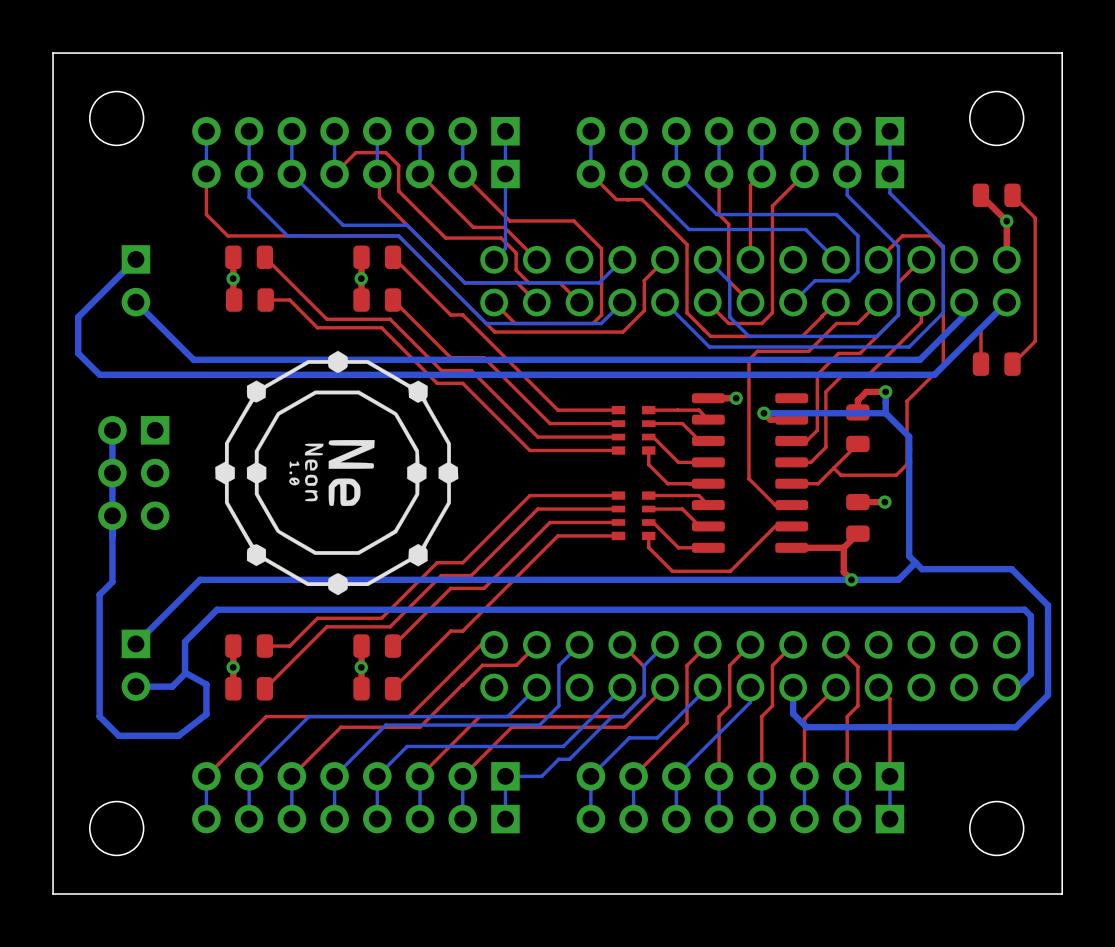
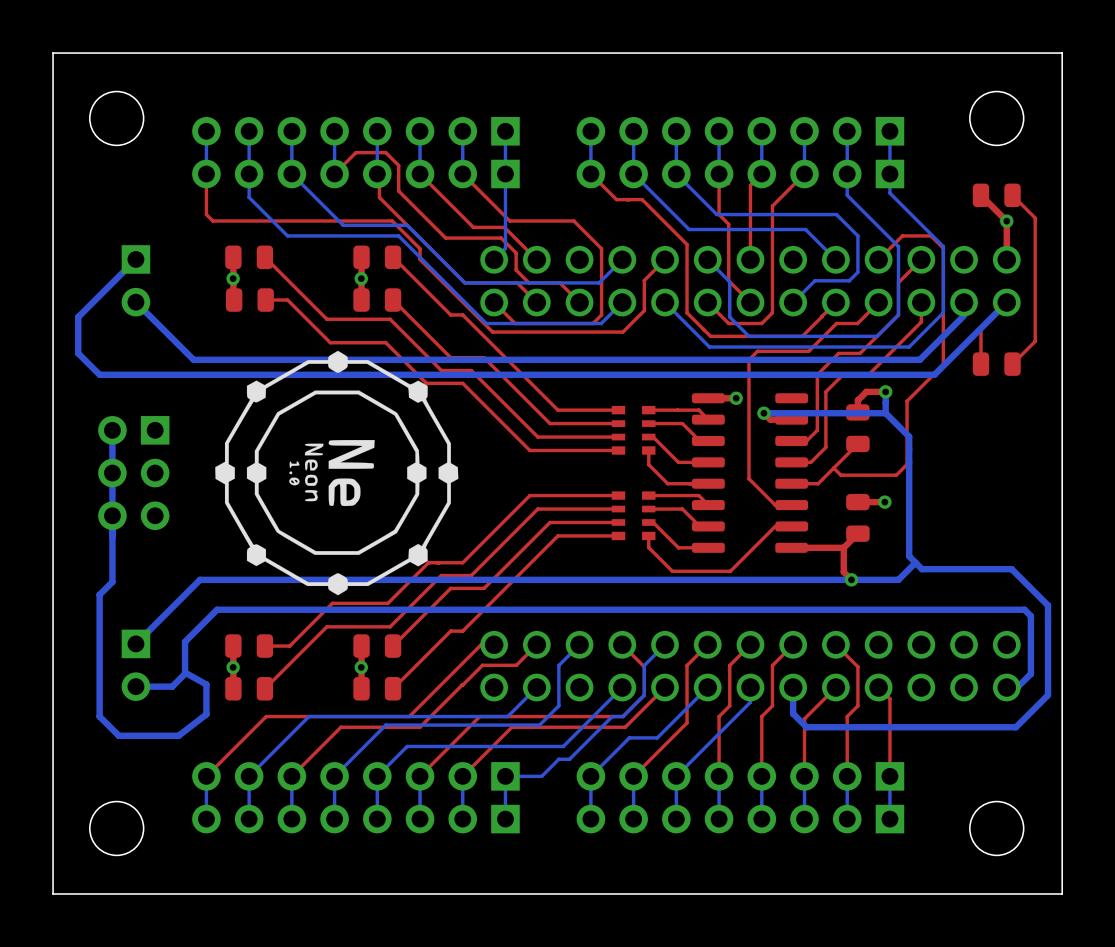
top track: (212, 220) (227, 235) (398, 235) (494, 332) -> (212, 220) (392, 220) (420, 248) (420, 259) (494, 332)
top track: (287, 300) (317, 327) (381, 327) (437, 383) -> (287, 300) (330, 342) (385, 342) (426, 383) (437, 383)
top track: (437, 562) (381, 618) (317, 618) -> (437, 562) (428, 562) (387, 603) (332, 603) (317, 618)

